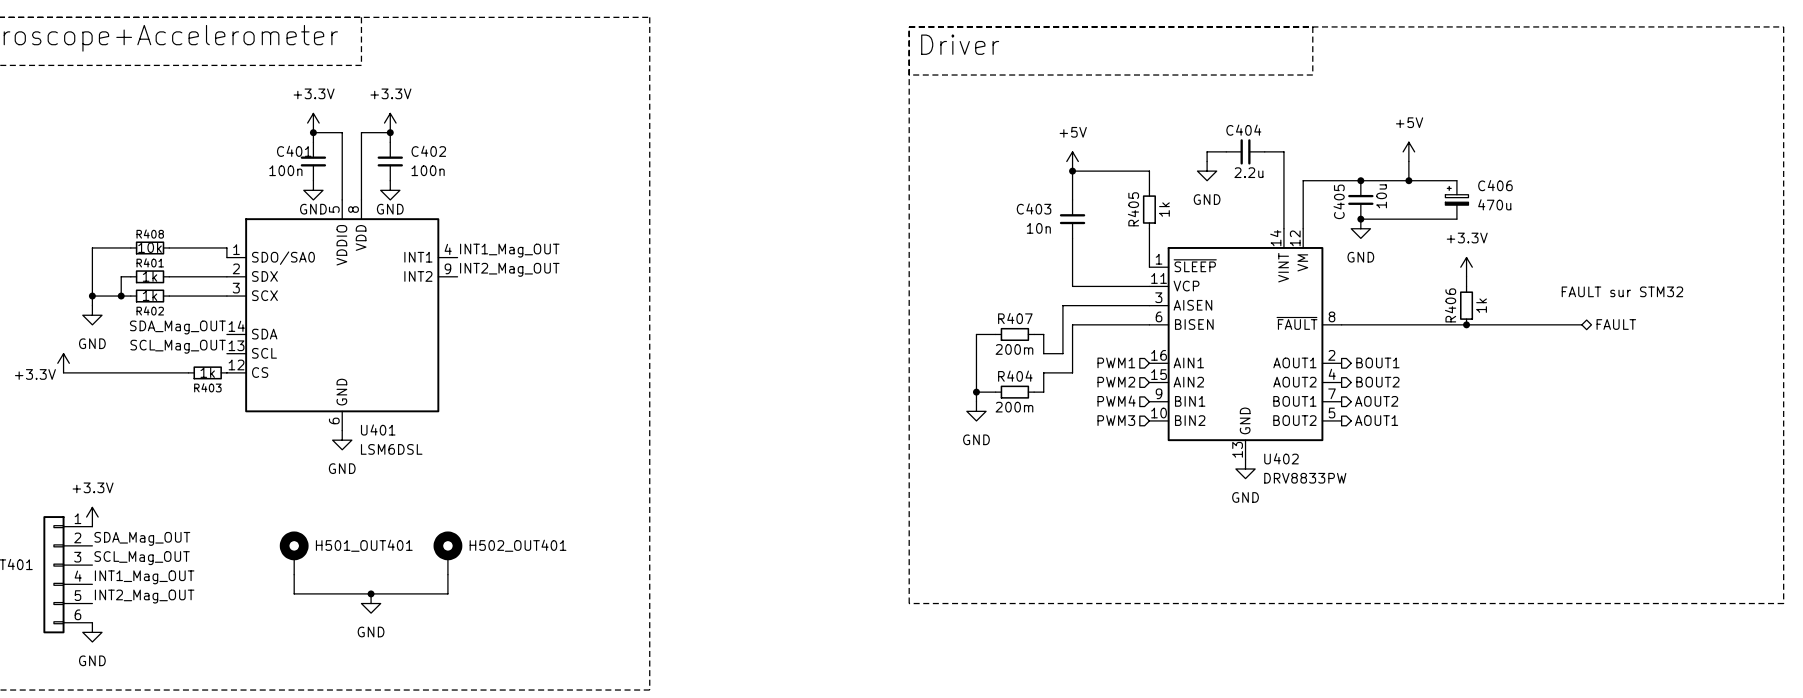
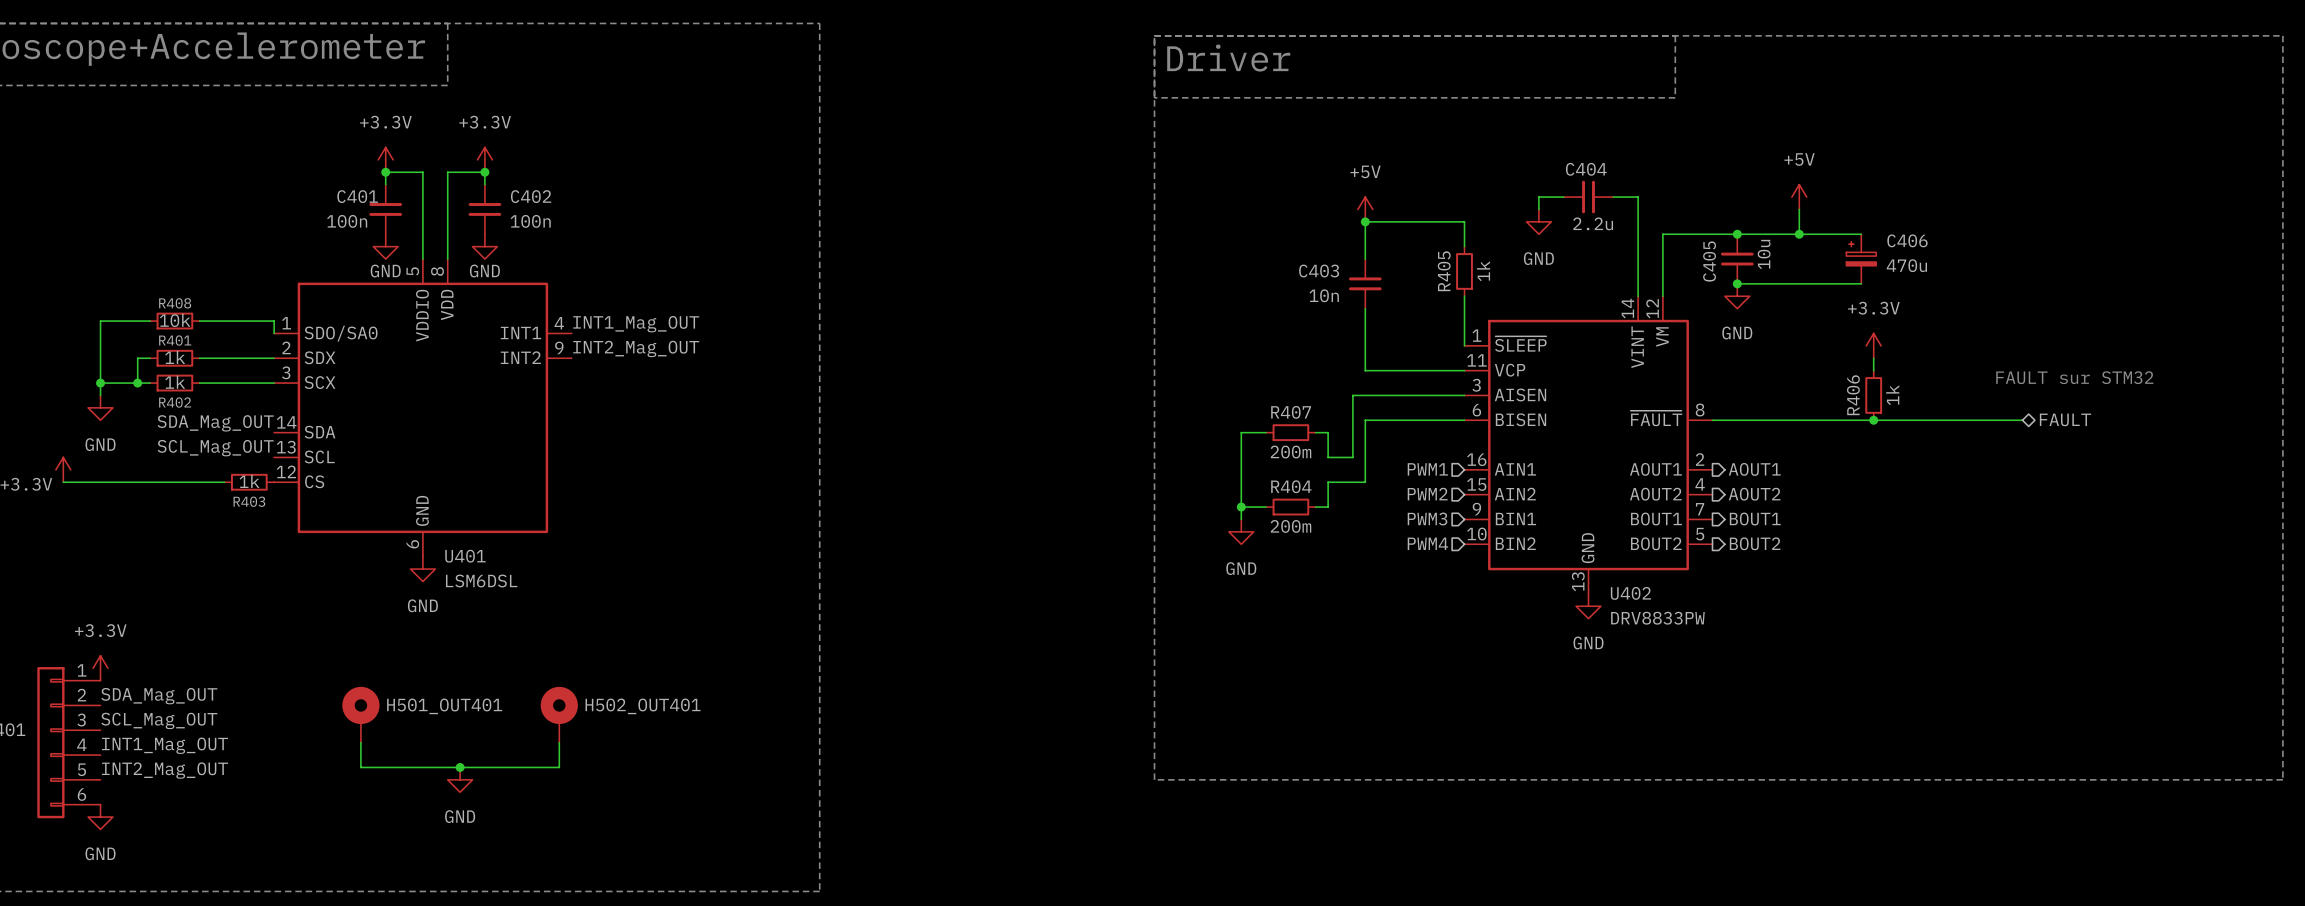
hierarchical label: BOUT1 (1377, 362) -> AOUT1 (1754, 469)
hierarchical label: BOUT2 (1377, 382) -> AOUT2 (1754, 494)
hierarchical label: PWM4 (1116, 401) -> PWM3 (1427, 518)
hierarchical label: AOUT2 (1376, 401) -> BOUT1 (1755, 518)
hierarchical label: PWM3 (1116, 420) -> PWM4 (1427, 543)
hierarchical label: AOUT1 (1376, 420) -> BOUT2 (1755, 543)

